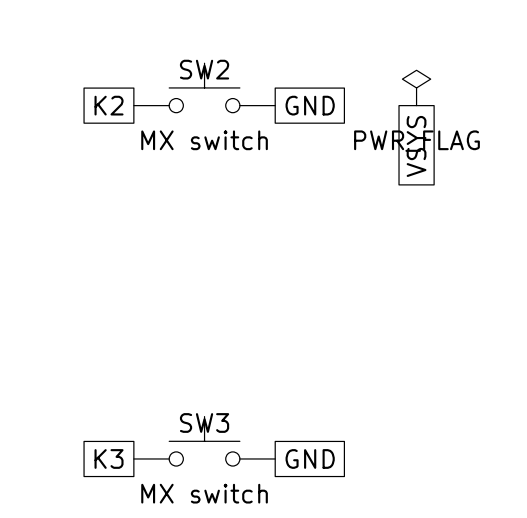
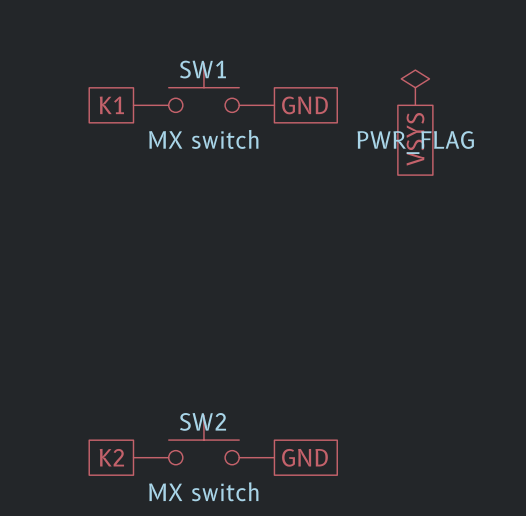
SW2 name: SW2 (204, 69) -> SW1 (202, 69)
global label: K2 (109, 105) -> K1 (111, 105)
SW3 name: SW3 (204, 422) -> SW2 (203, 421)
global label: K3 (109, 458) -> K2 (111, 457)

